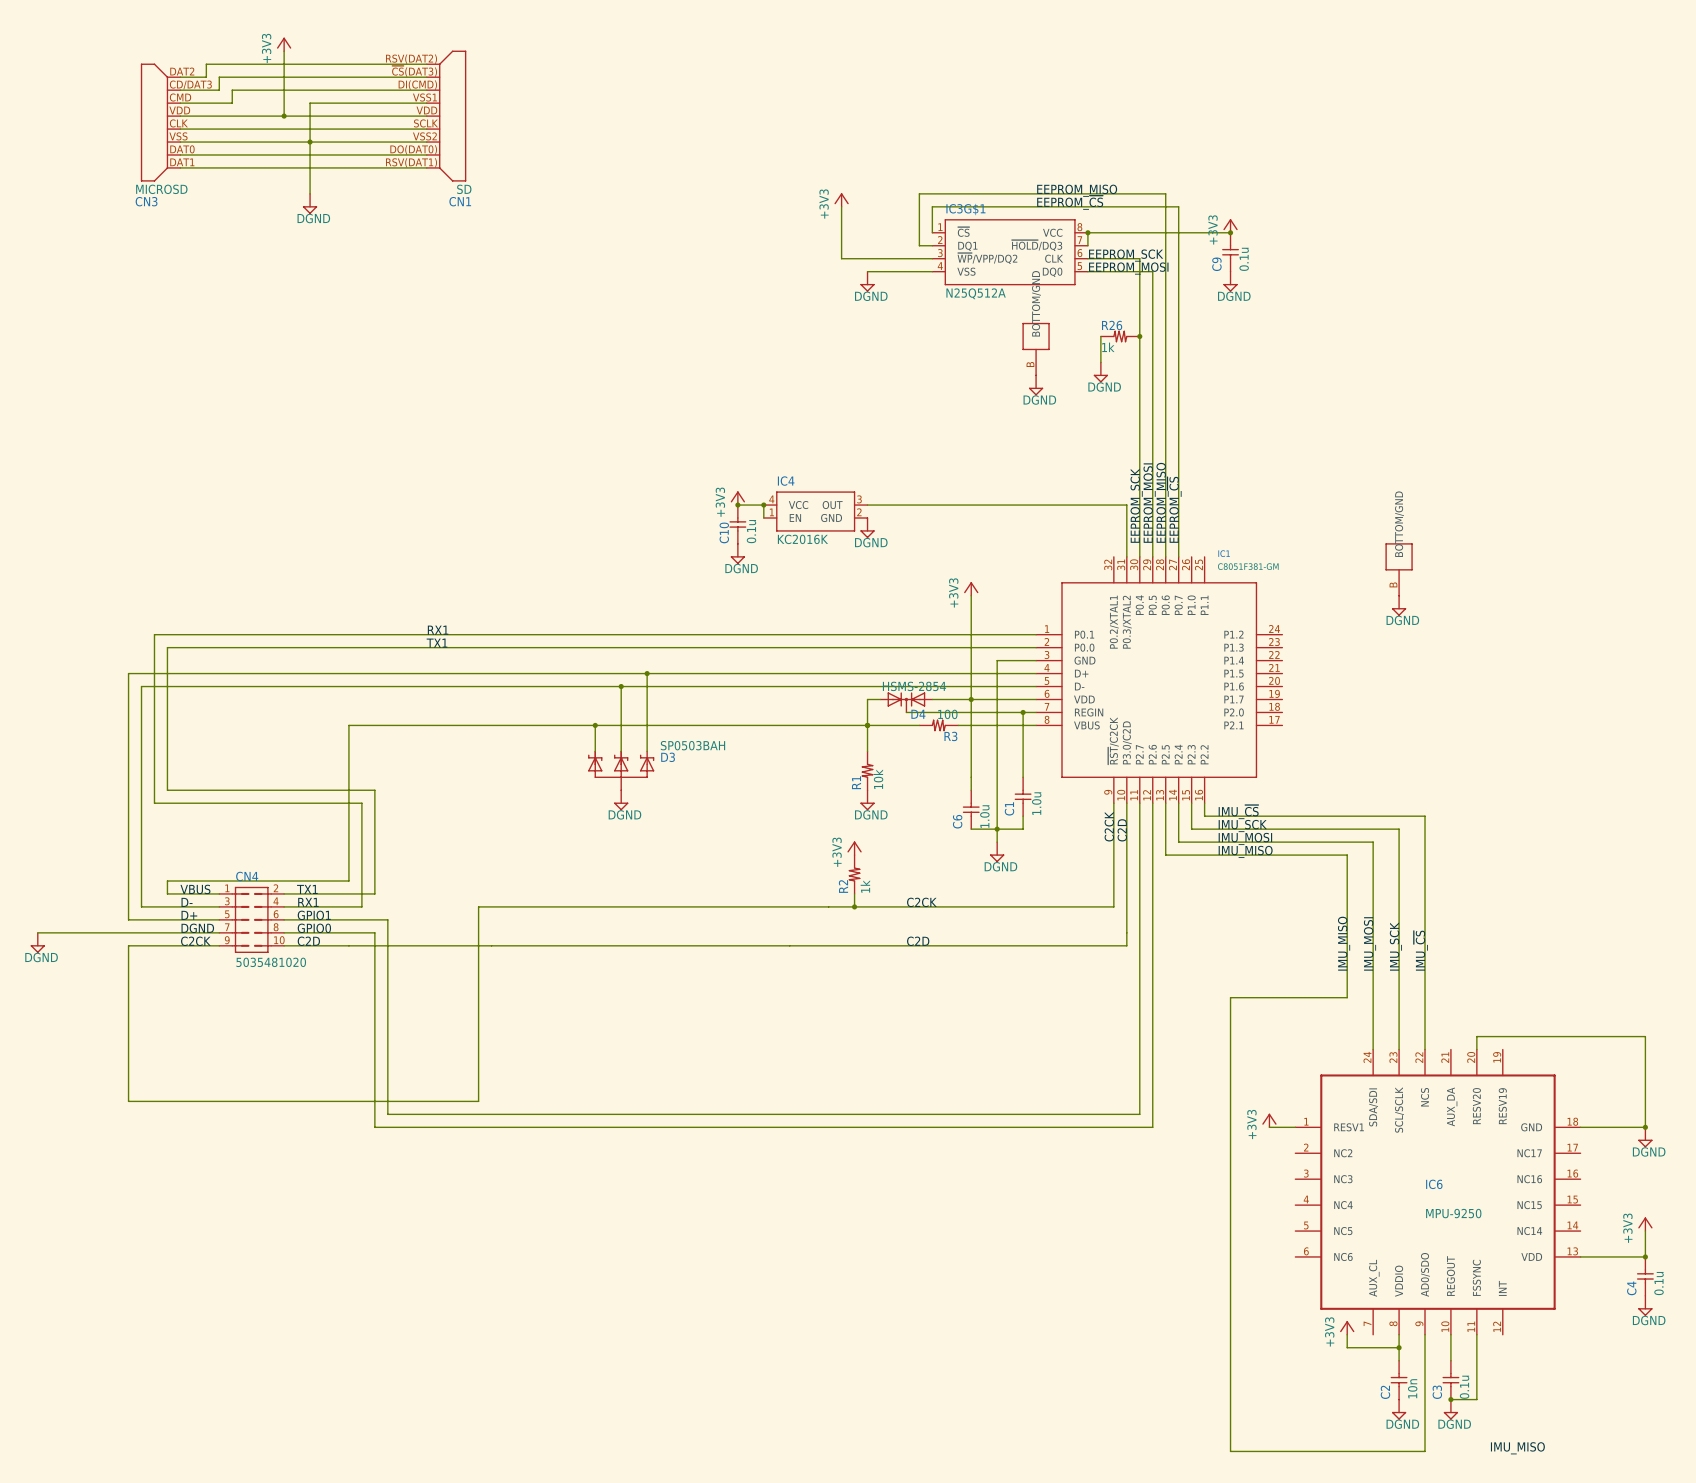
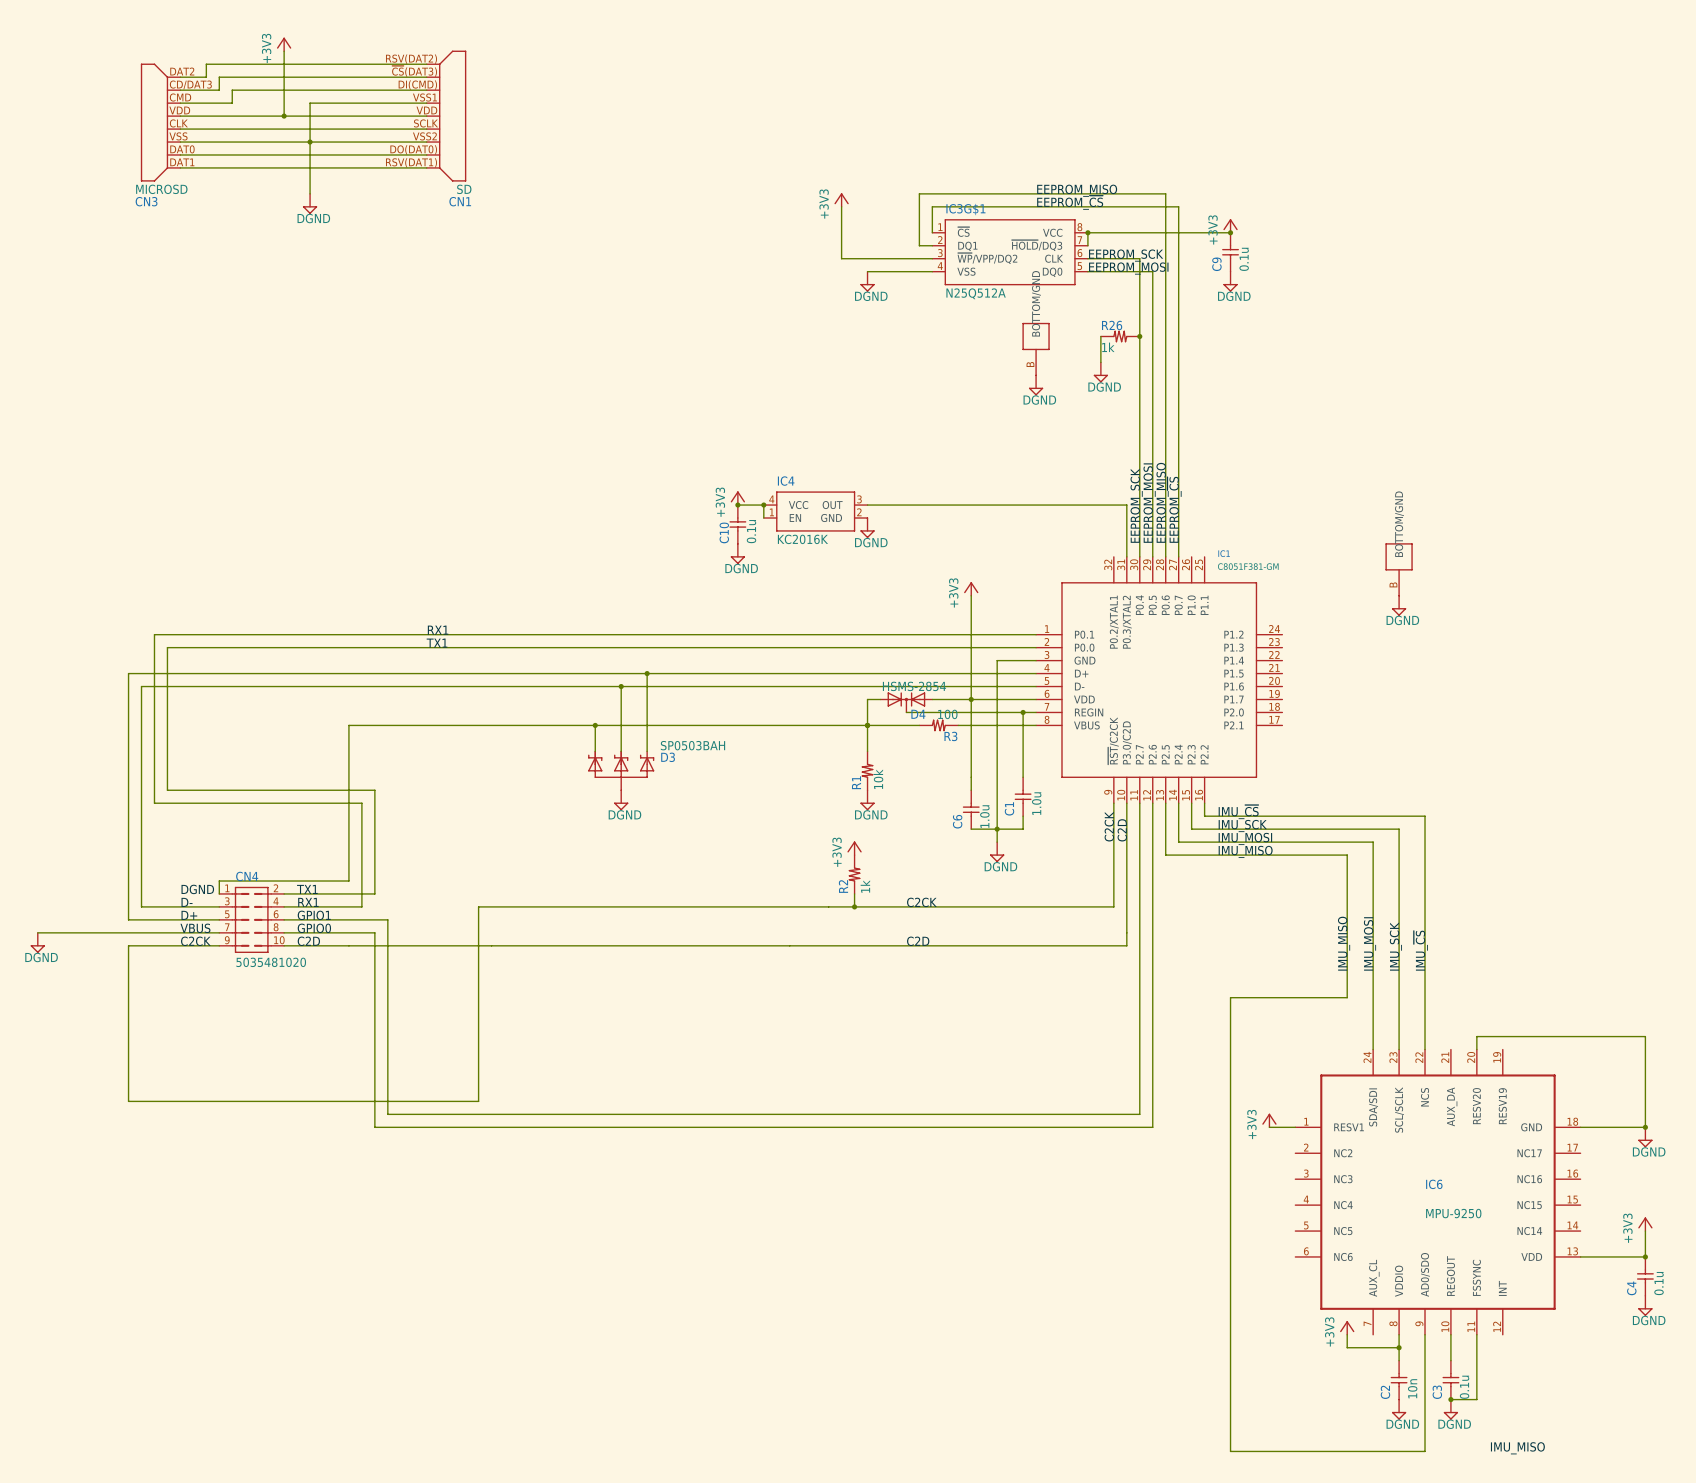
wire: (219, 881) (167, 881) (167, 893) (219, 893) -> (219, 881) (219, 893)
label: VBUS (195, 889) -> DGND (197, 889)
label: DGND (197, 928) -> VBUS (195, 928)

